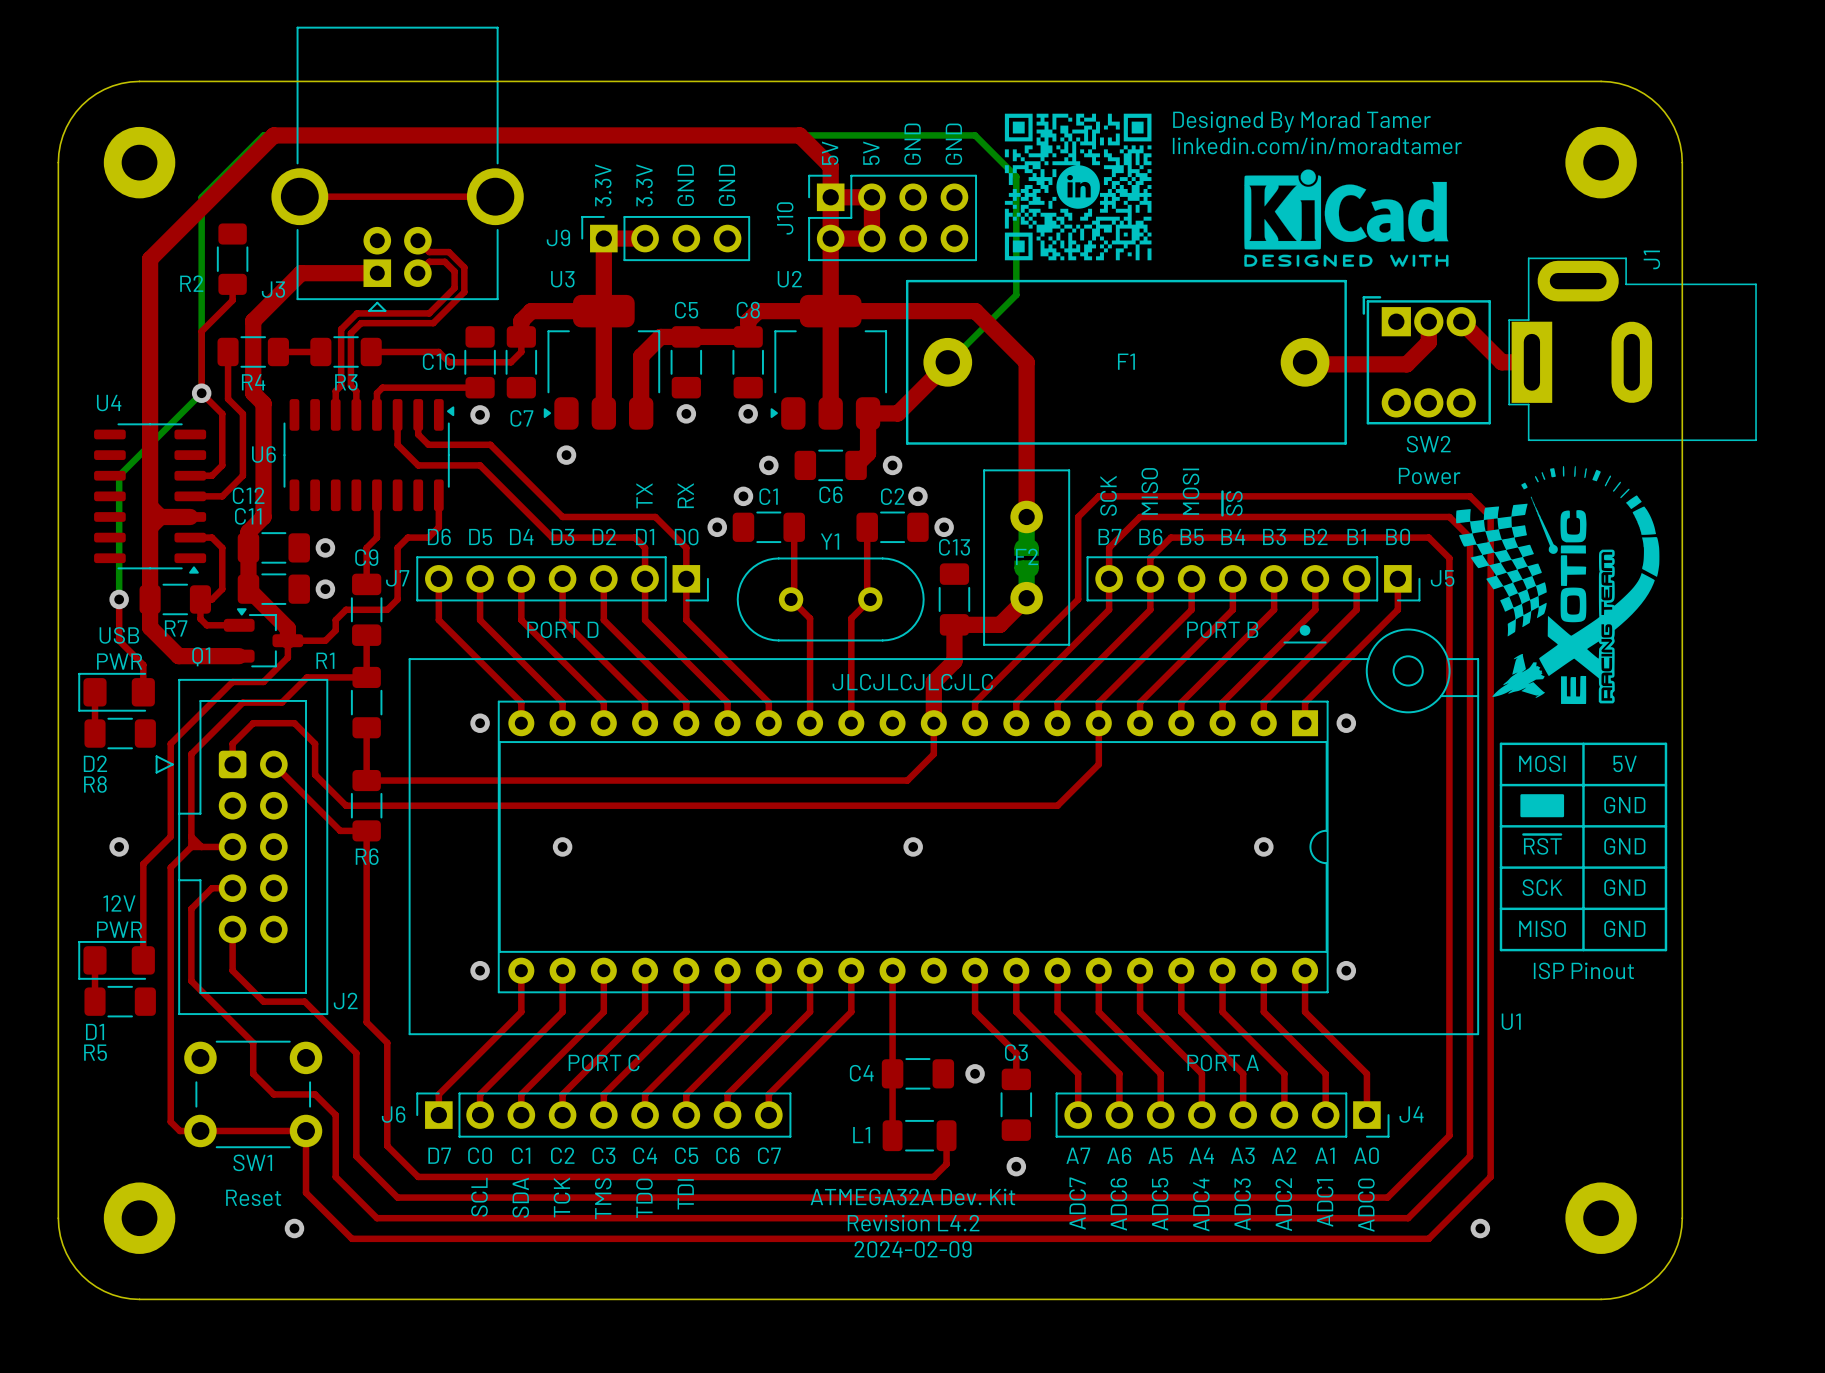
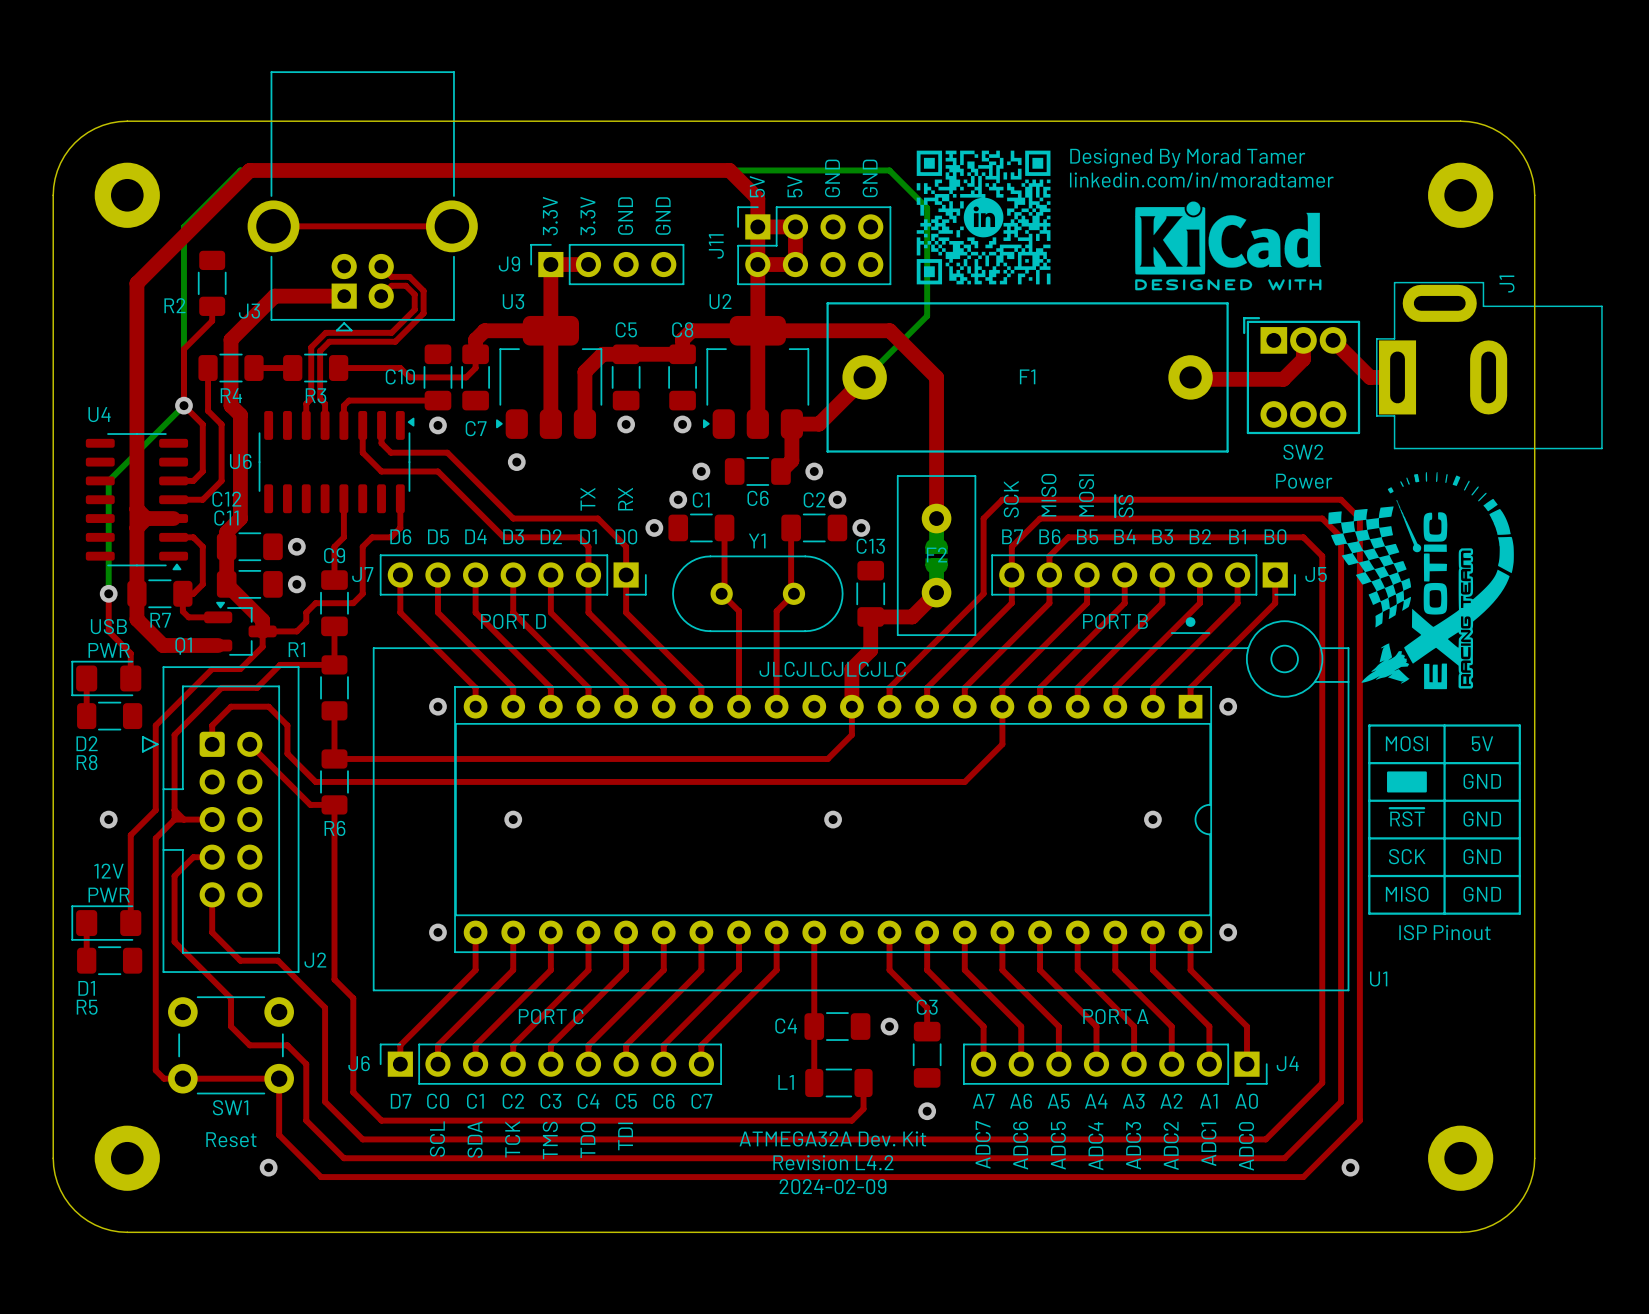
J10 name: J10 (785, 218) -> J11 (716, 246)

